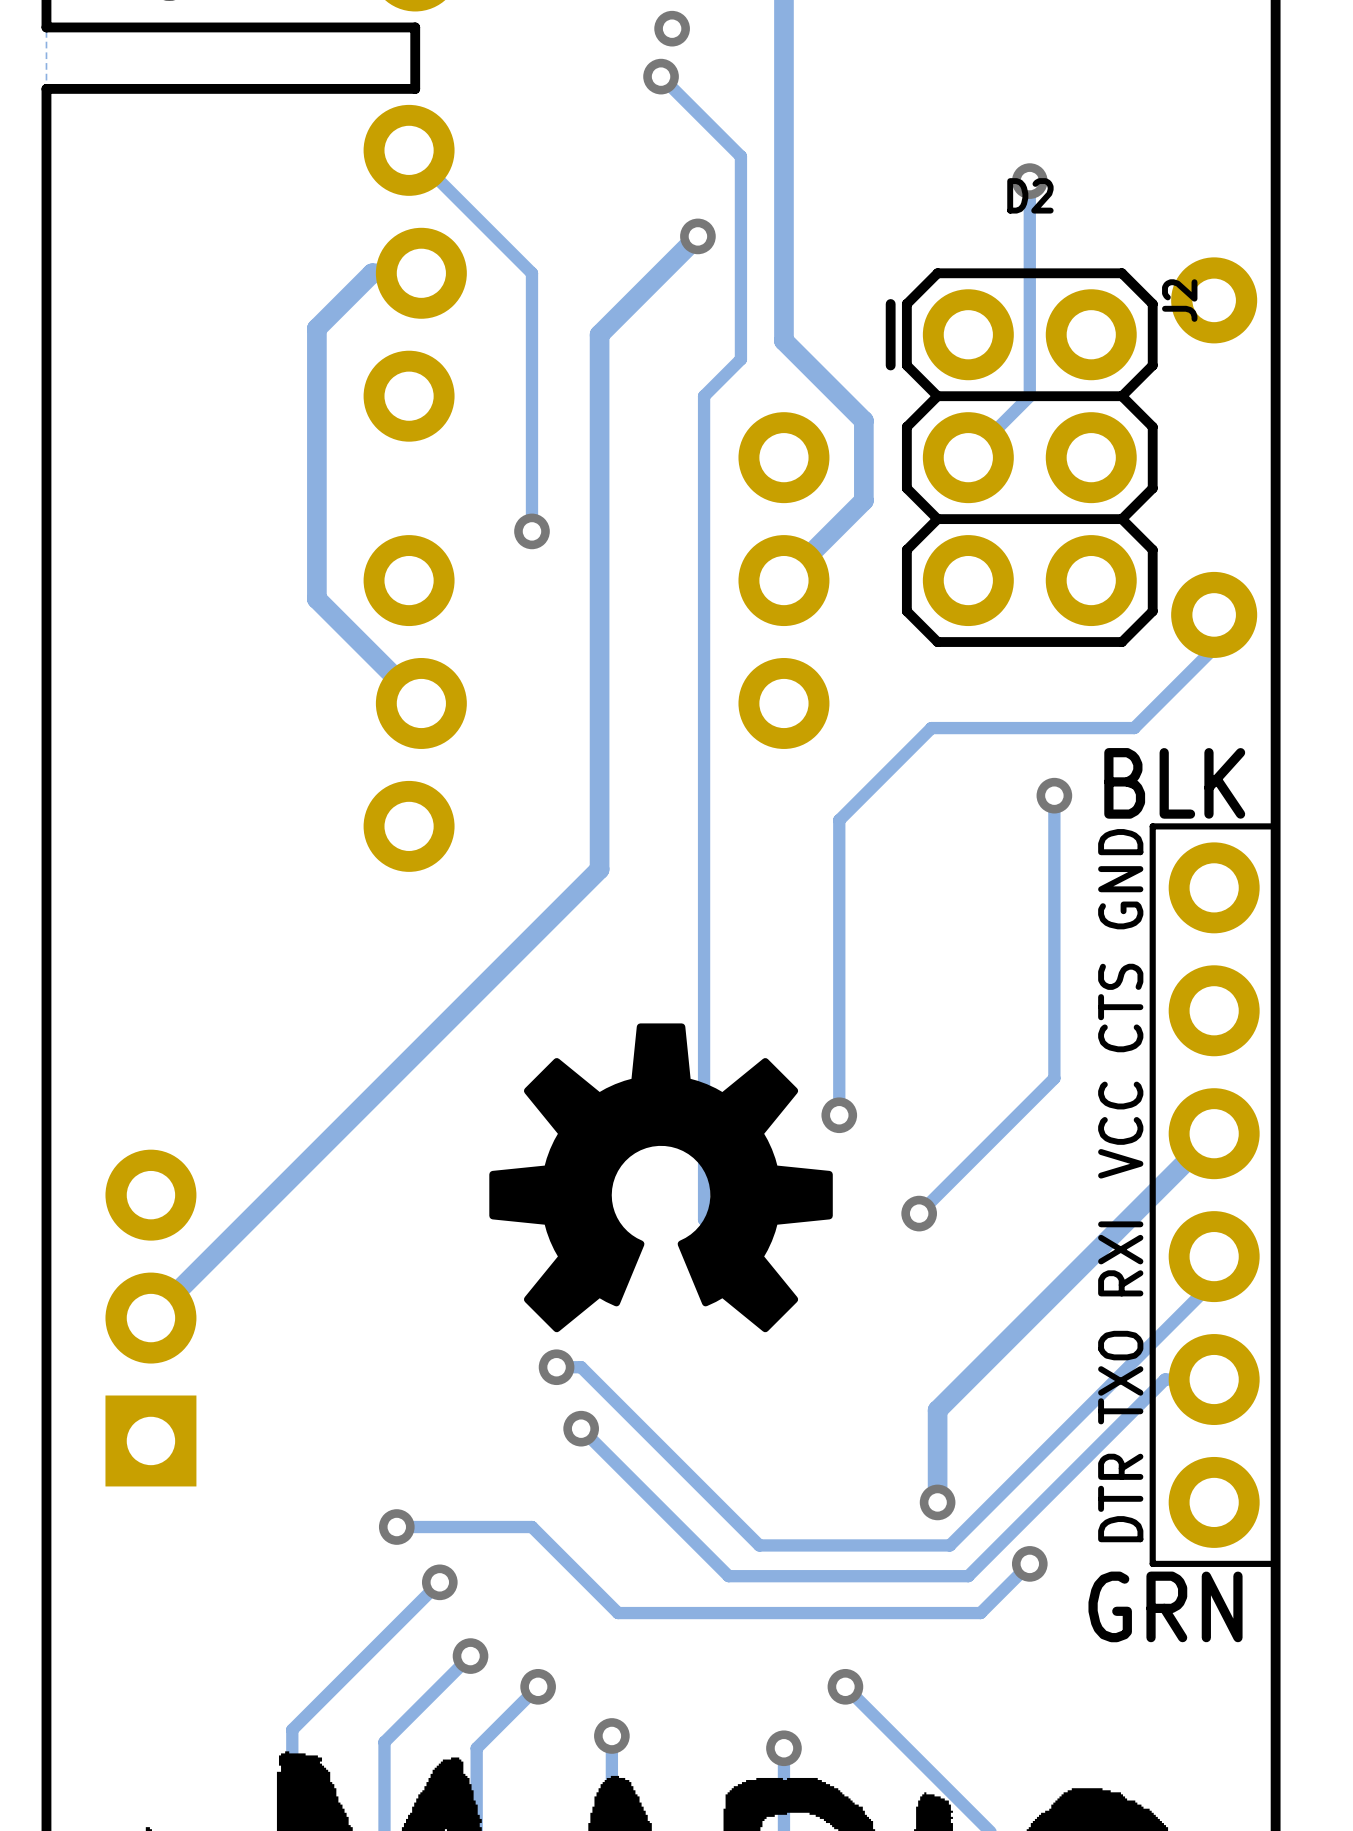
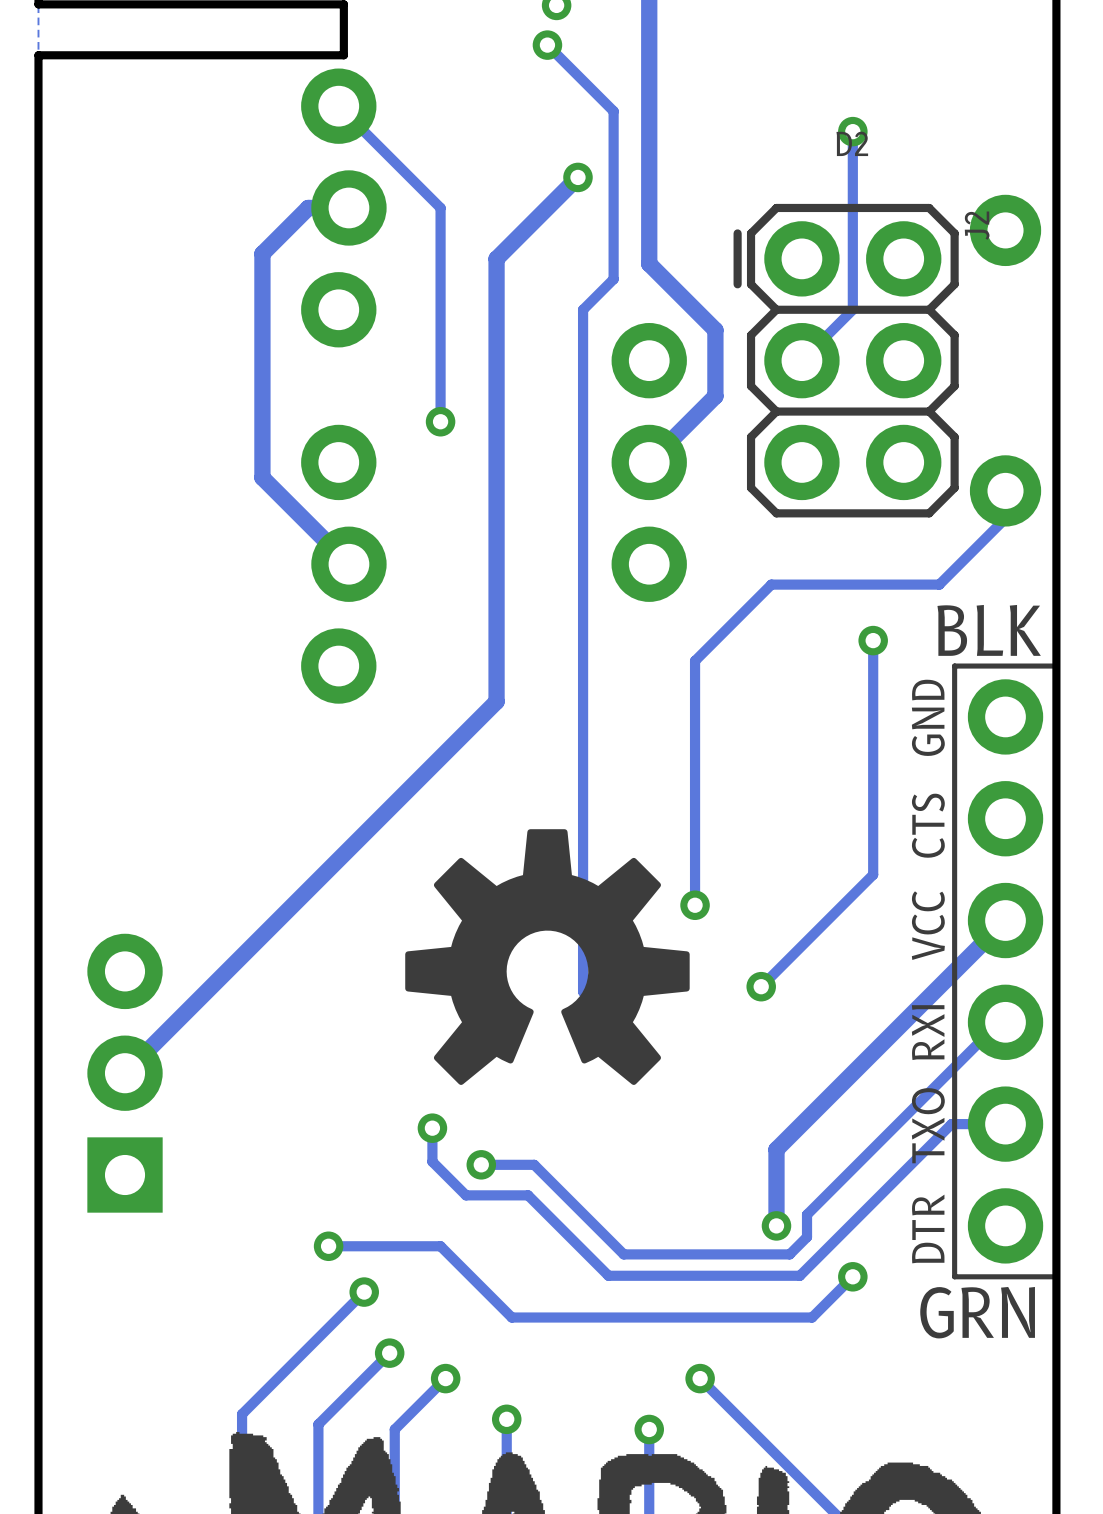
track: (1214, 1256) (1214, 1281) (949, 1545) (759, 1545) (581, 1367) (556, 1367) -> (1005, 1022) (999, 1022) (807, 1214) (807, 1237) (789, 1254) (623, 1254) (534, 1164) (481, 1164)
via position: (556, 1367) -> (432, 1128)
track: (1165, 1379) (968, 1576) (728, 1576) (581, 1428) -> (964, 1124) (951, 1124) (799, 1275) (608, 1275) (528, 1195) (466, 1195) (432, 1161) (432, 1128)

